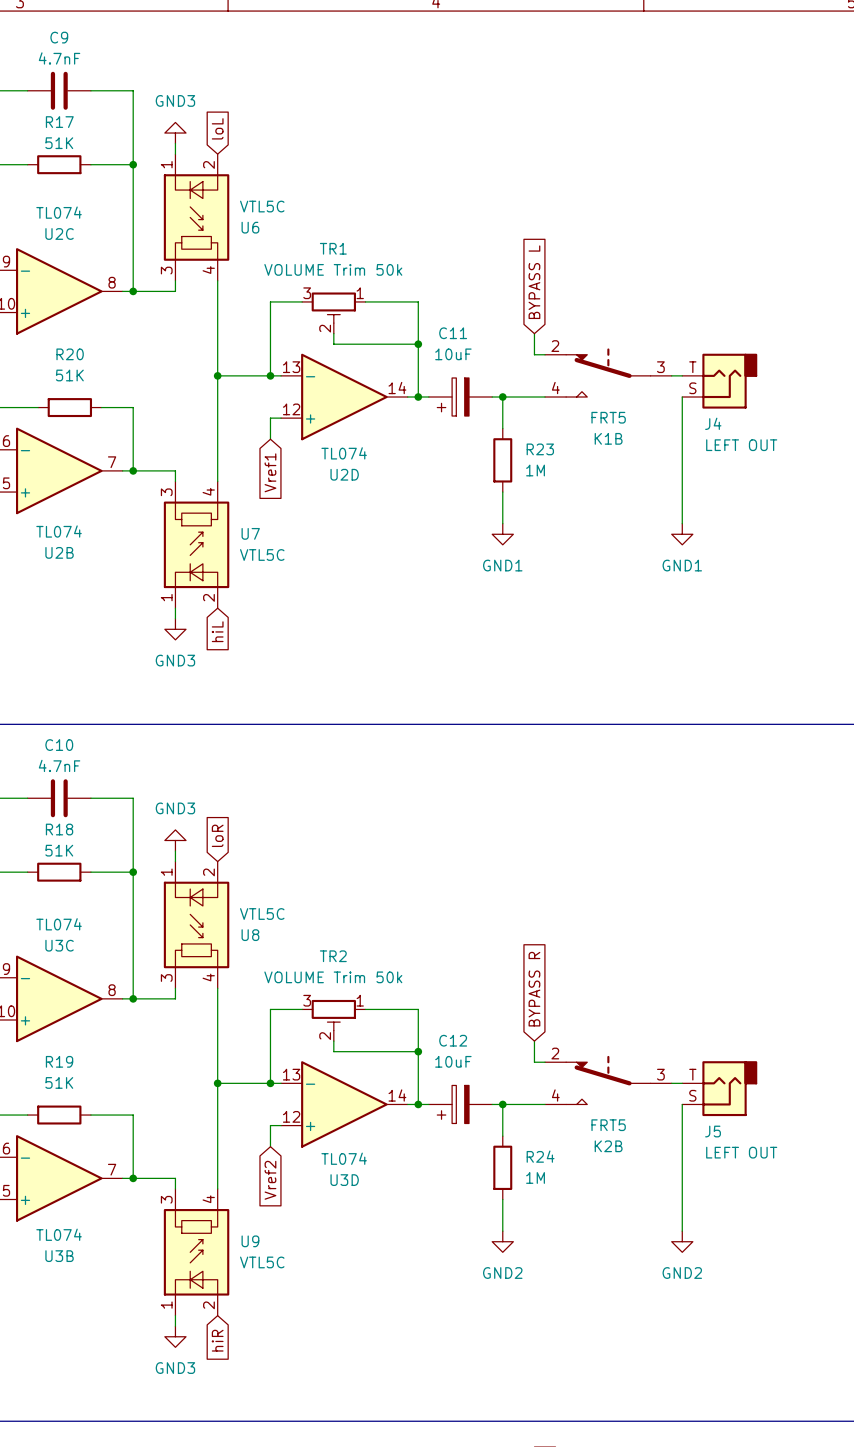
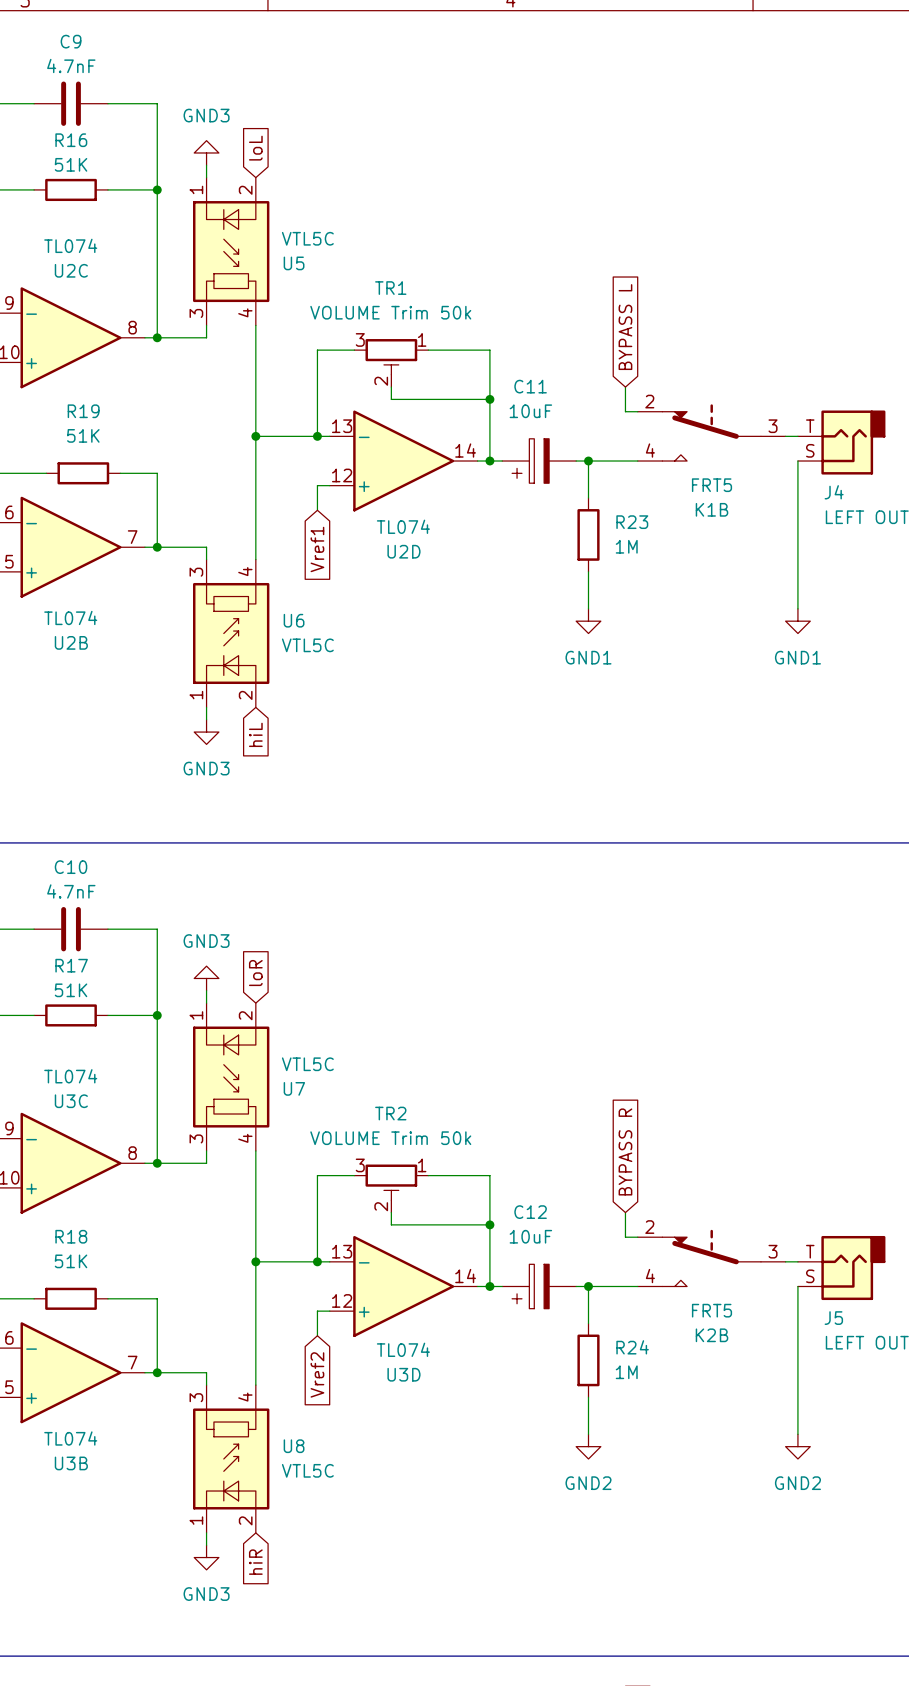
R17 name: R17 (59, 122) -> R16 (71, 140)
U6 name: U6 (250, 227) -> U5 (294, 263)
R20 name: R20 (70, 354) -> R19 (83, 411)
U7 name: U7 (250, 533) -> U6 (294, 620)
R18 name: R18 (59, 829) -> R17 (71, 965)
U8 name: U8 (250, 935) -> U7 (294, 1088)
R19 name: R19 (59, 1061) -> R18 (71, 1236)
U9 name: U9 (250, 1241) -> U8 (294, 1446)

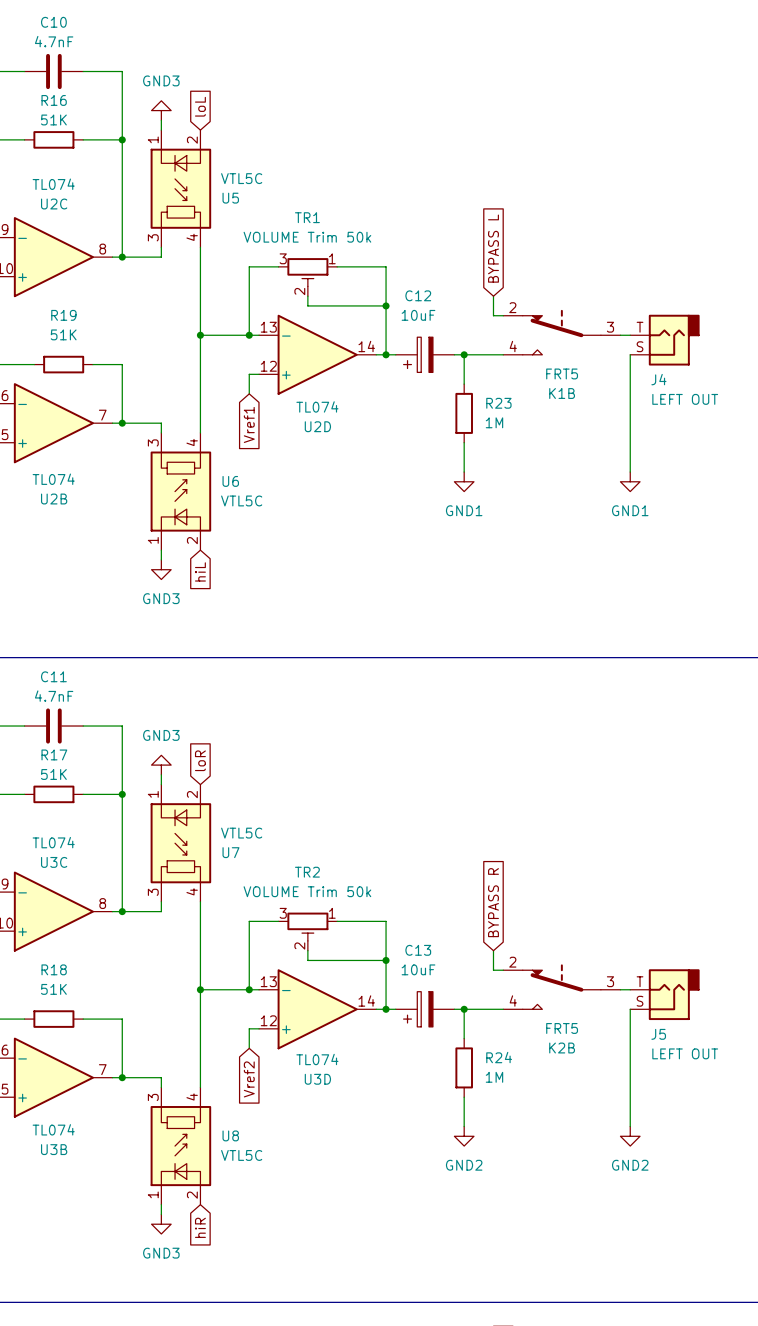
C9 name: C9 (71, 41) -> C10 (53, 22)
C11 name: C11 (530, 386) -> C12 (418, 295)
C10 name: C10 (71, 867) -> C11 (53, 676)
C12 name: C12 (530, 1212) -> C13 (418, 950)

